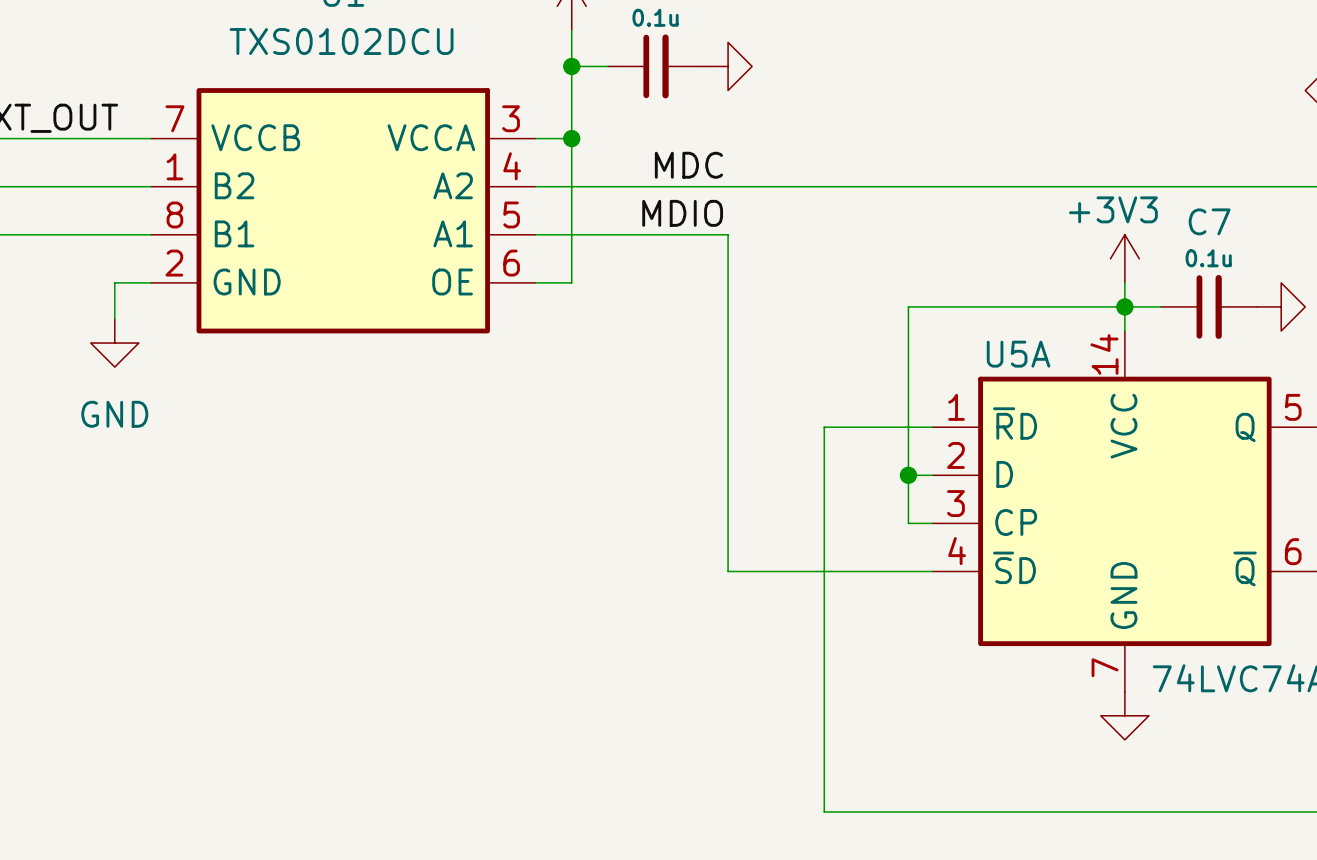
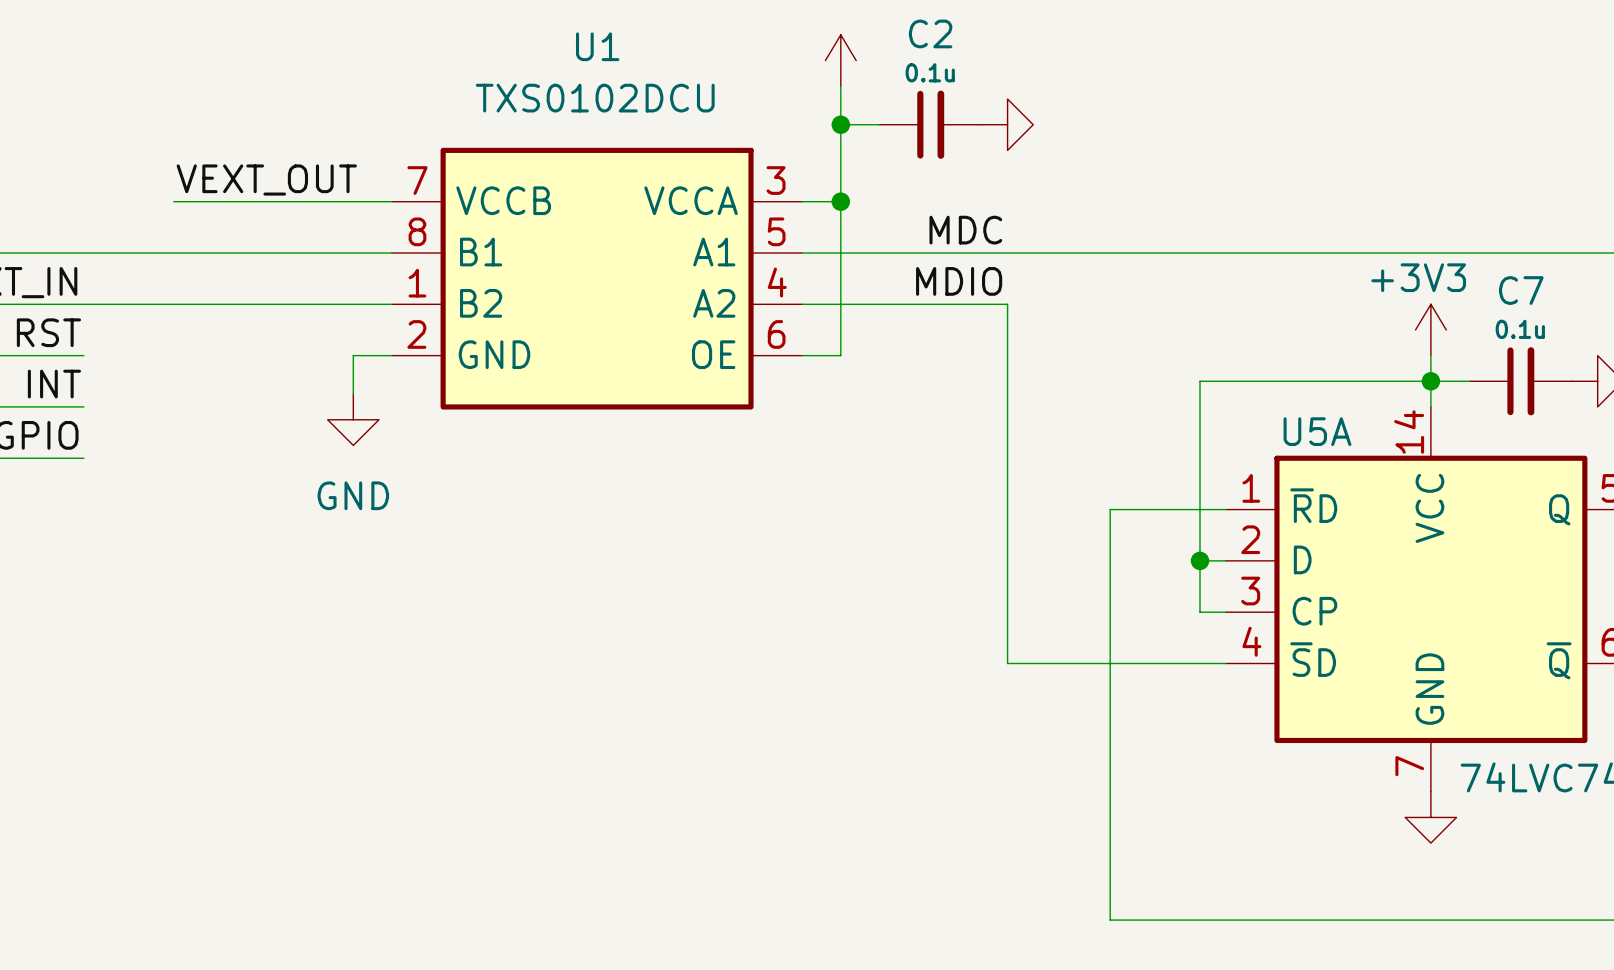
U1 pin number: 1 (174, 166) -> 8 (417, 231)
U1 pin number: 4 (512, 166) -> 5 (776, 231)
U1 pin name: B2 (234, 185) -> B1 (481, 252)
U1 pin name: A2 (453, 185) -> A1 (714, 252)
U1 pin number: 8 (174, 214) -> 1 (417, 283)
U1 pin number: 5 (511, 214) -> 4 (777, 282)
U1 pin name: B1 (234, 233) -> B2 (481, 303)
U1 pin name: A1 (453, 233) -> A2 (714, 303)

